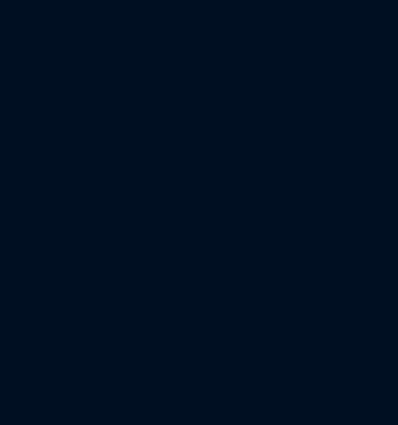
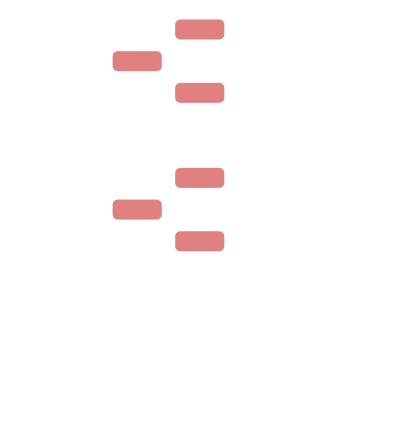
part: none -> (168, 61)
part: none -> (168, 209)

